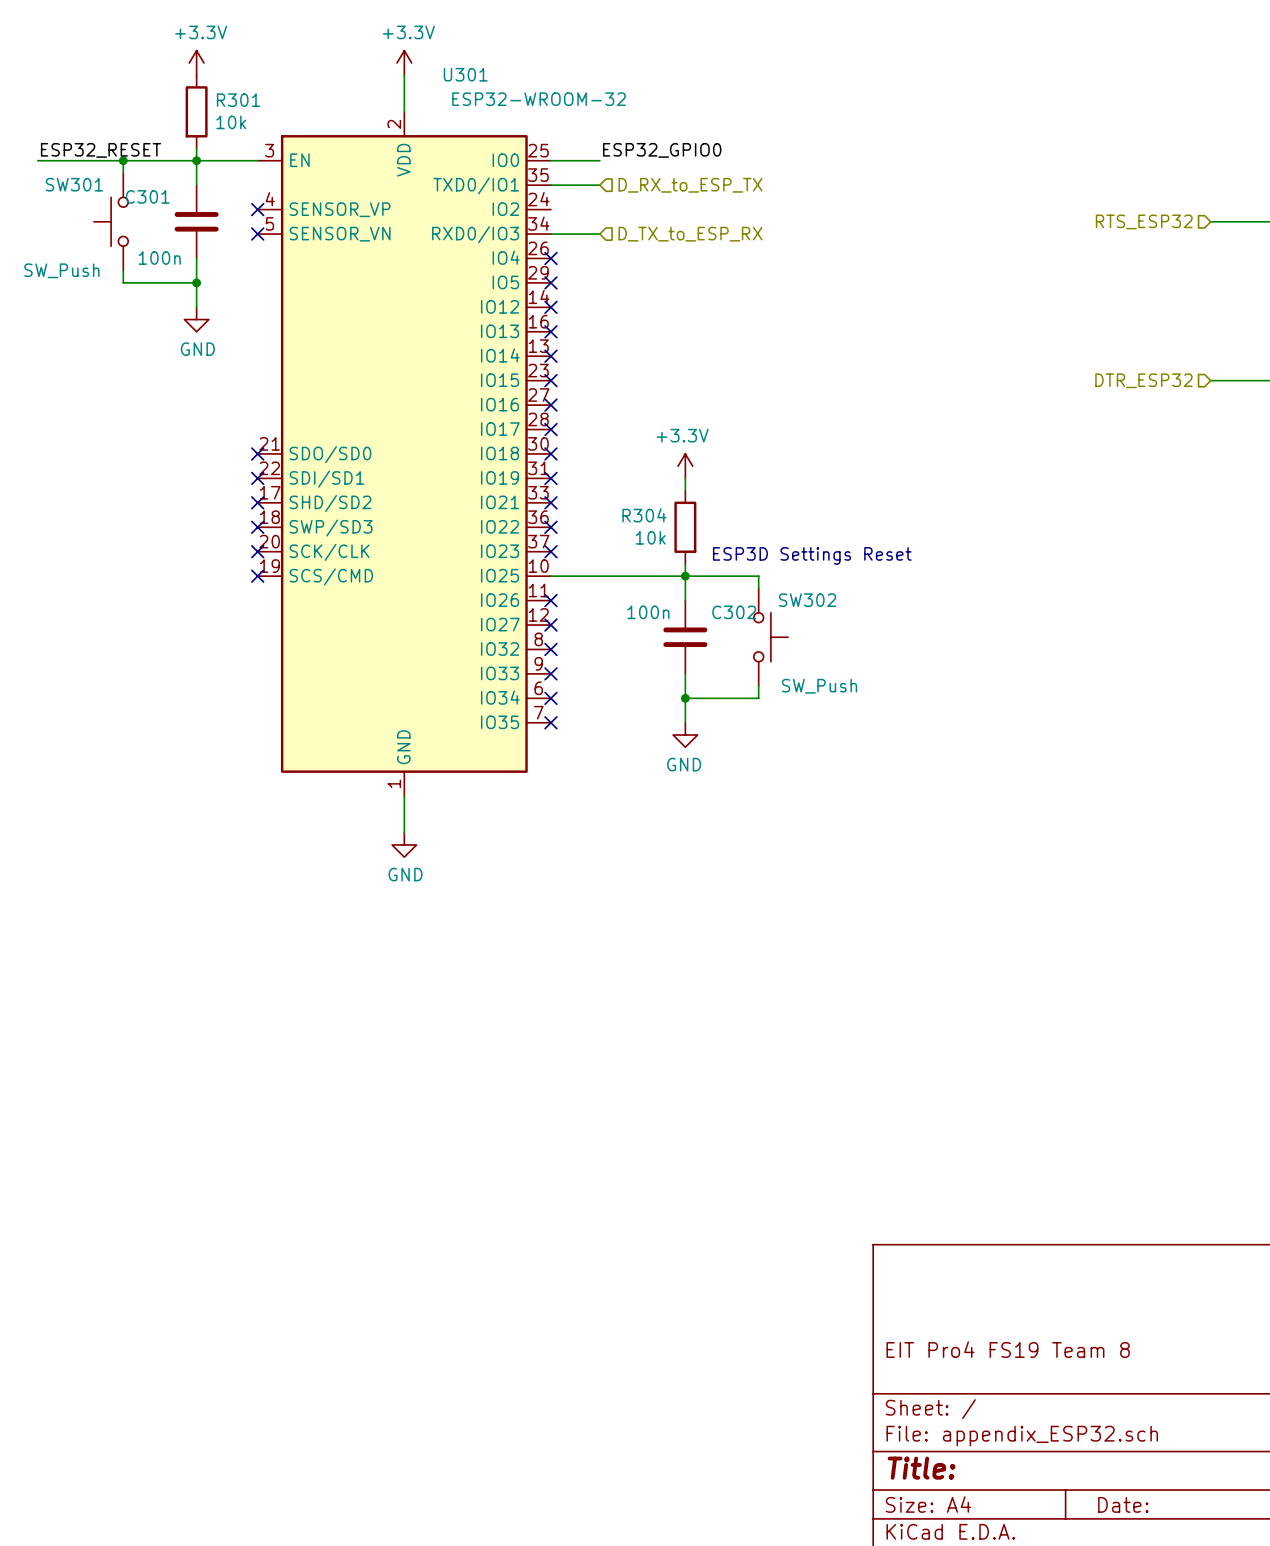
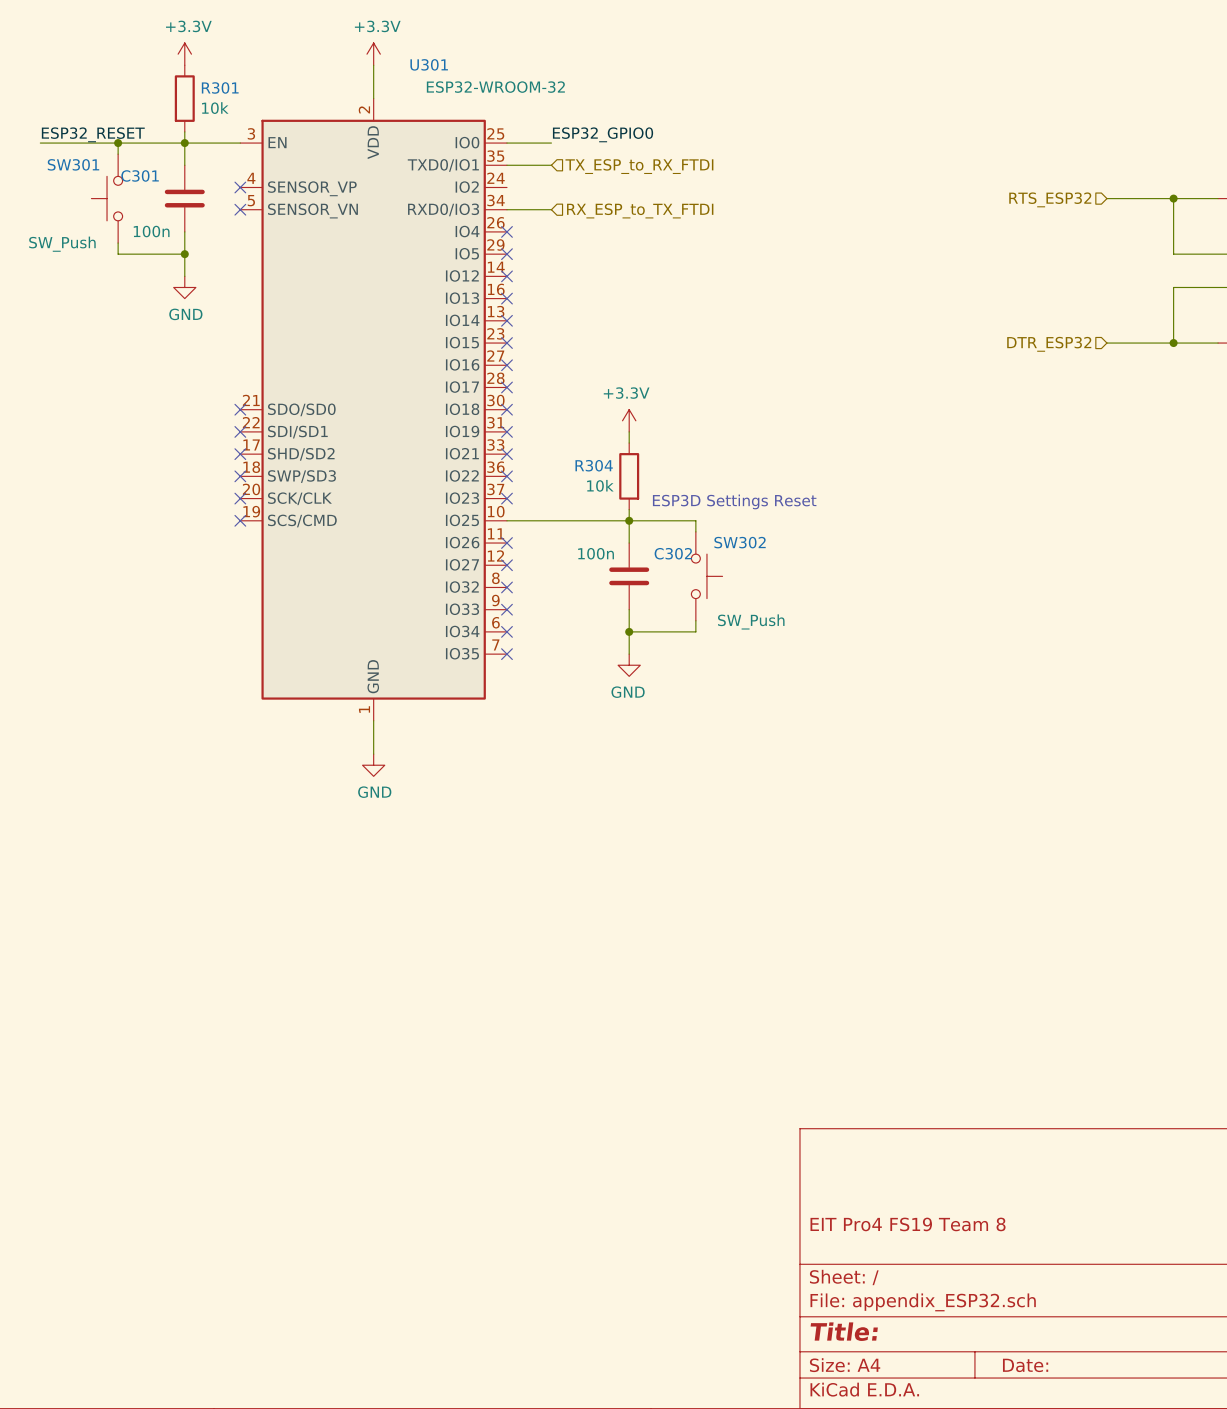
hierarchical label: D_RX_to_ESP_TX (690, 185) -> TX_ESP_to_RX_FTDI (639, 166)
hierarchical label: D_TX_to_ESP_RX (690, 234) -> RX_ESP_to_TX_FTDI (640, 210)

